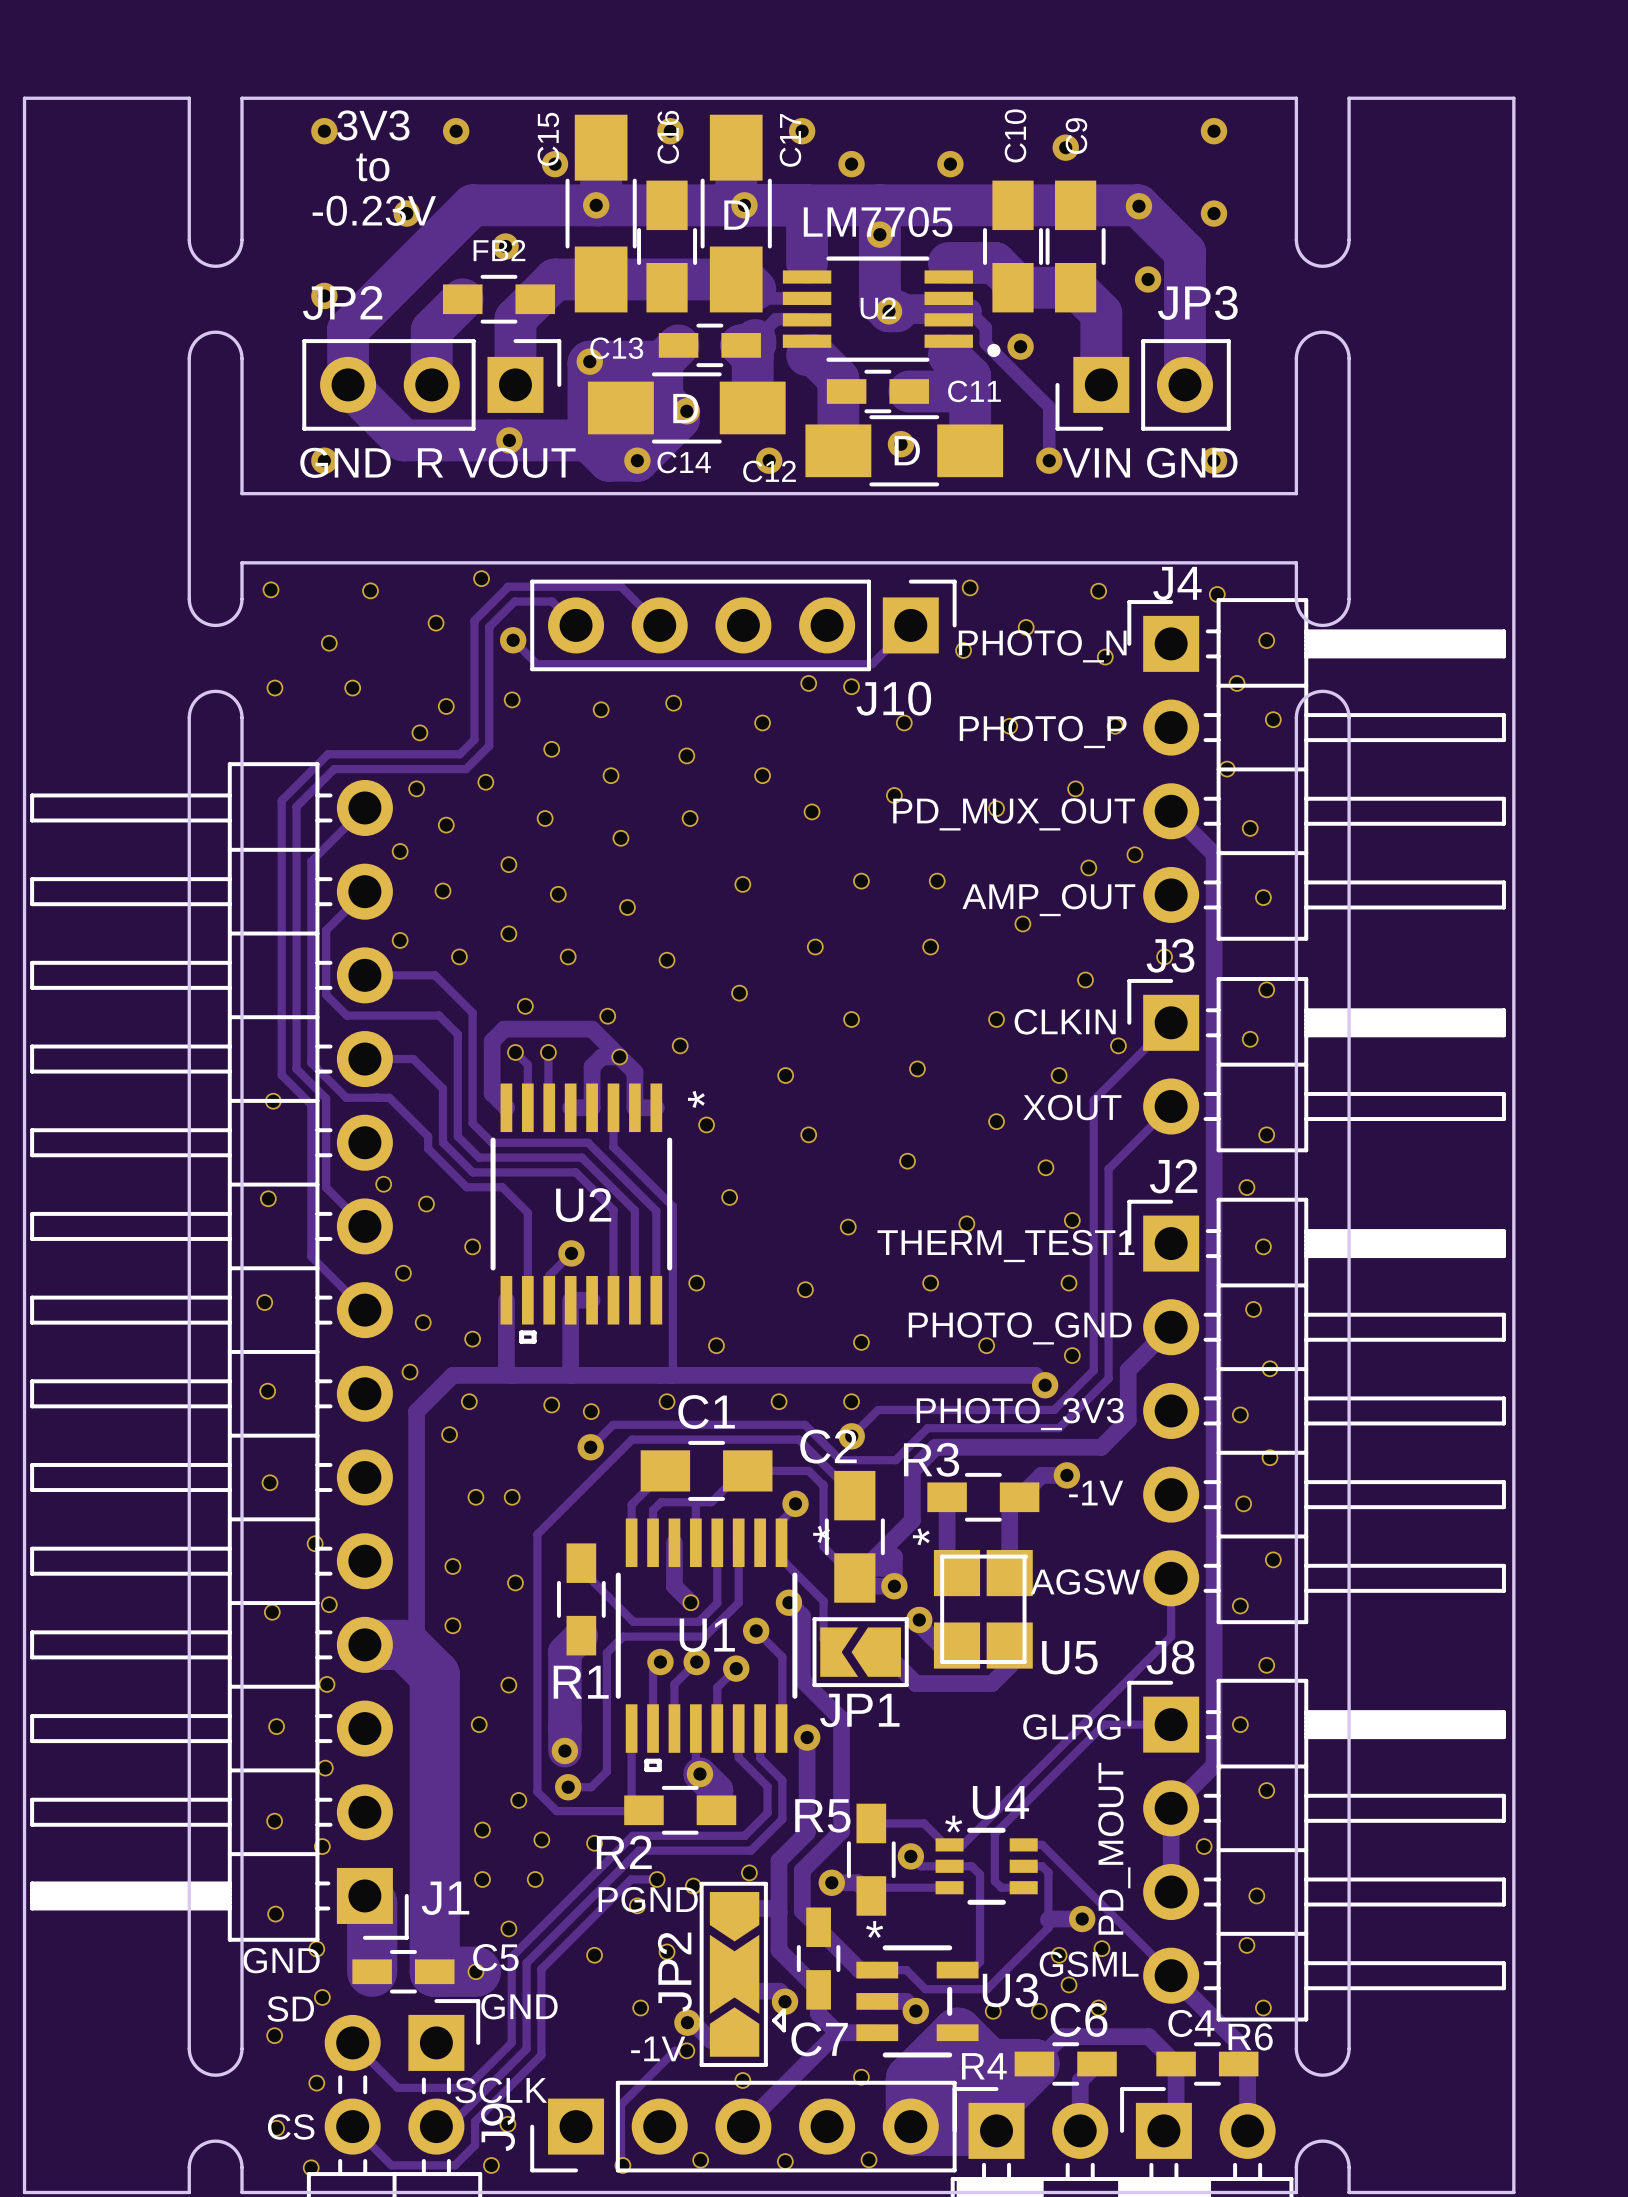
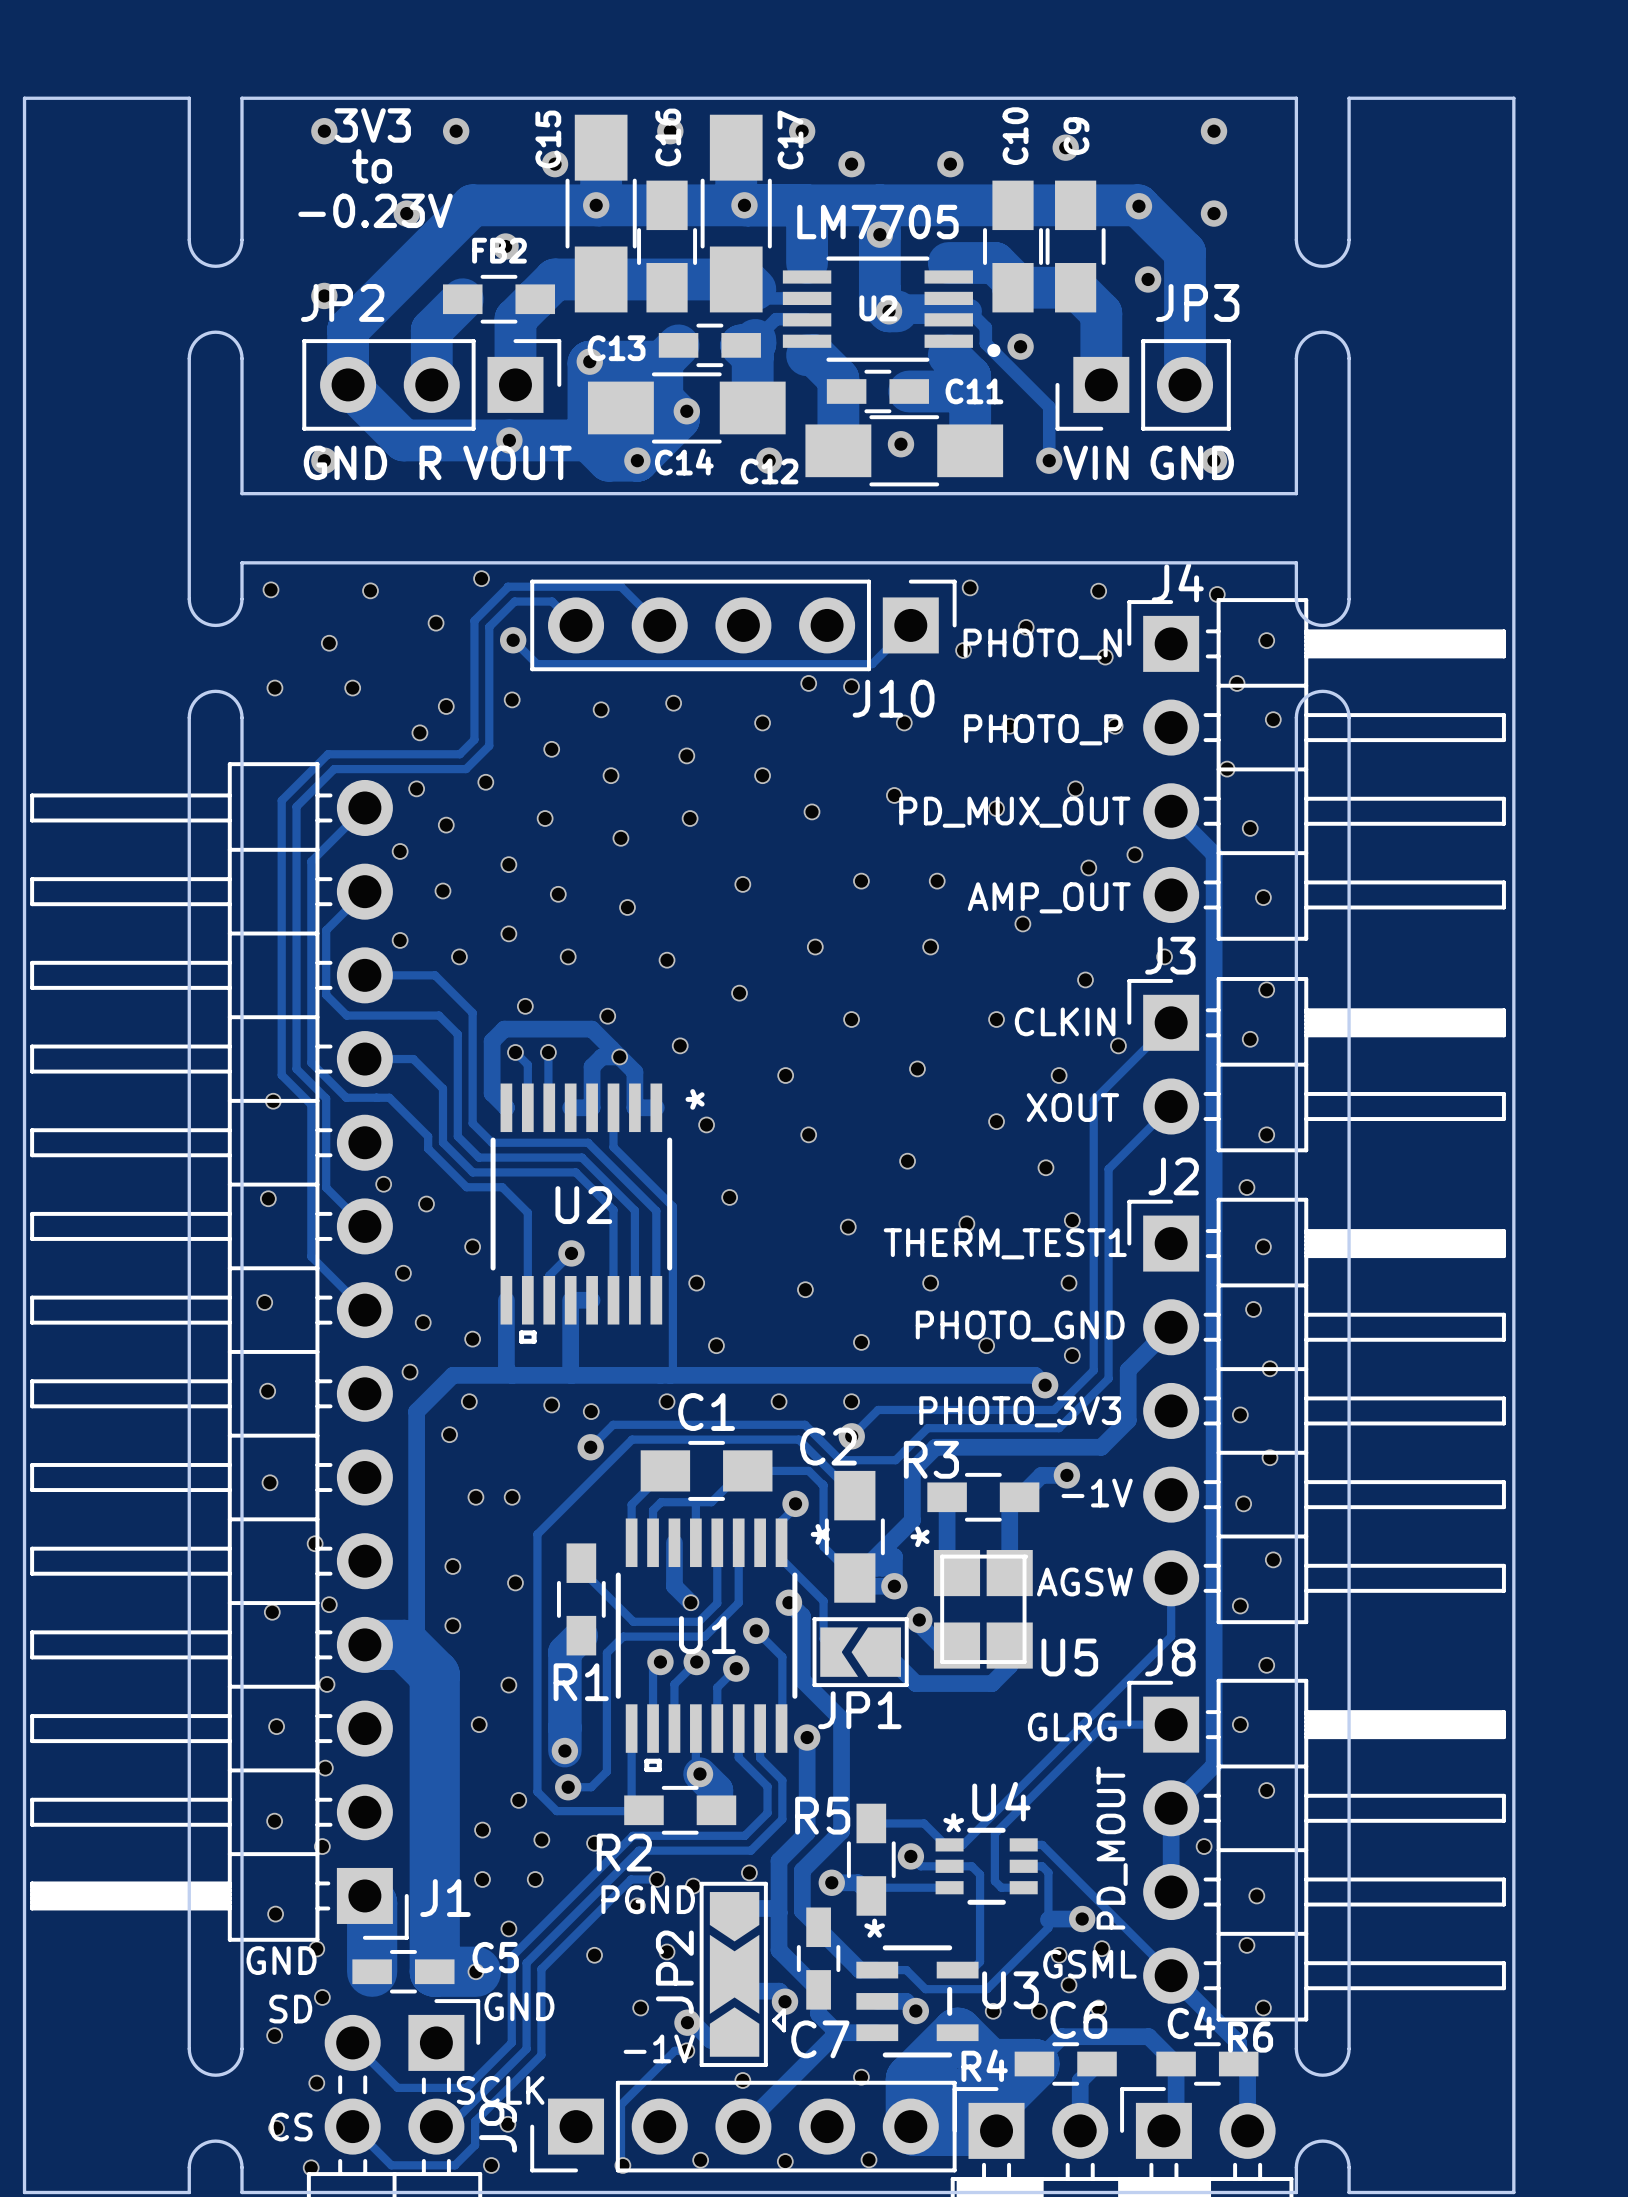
text: D (736, 215) -> none
text: D (685, 408) -> none
text: D (907, 450) -> none

